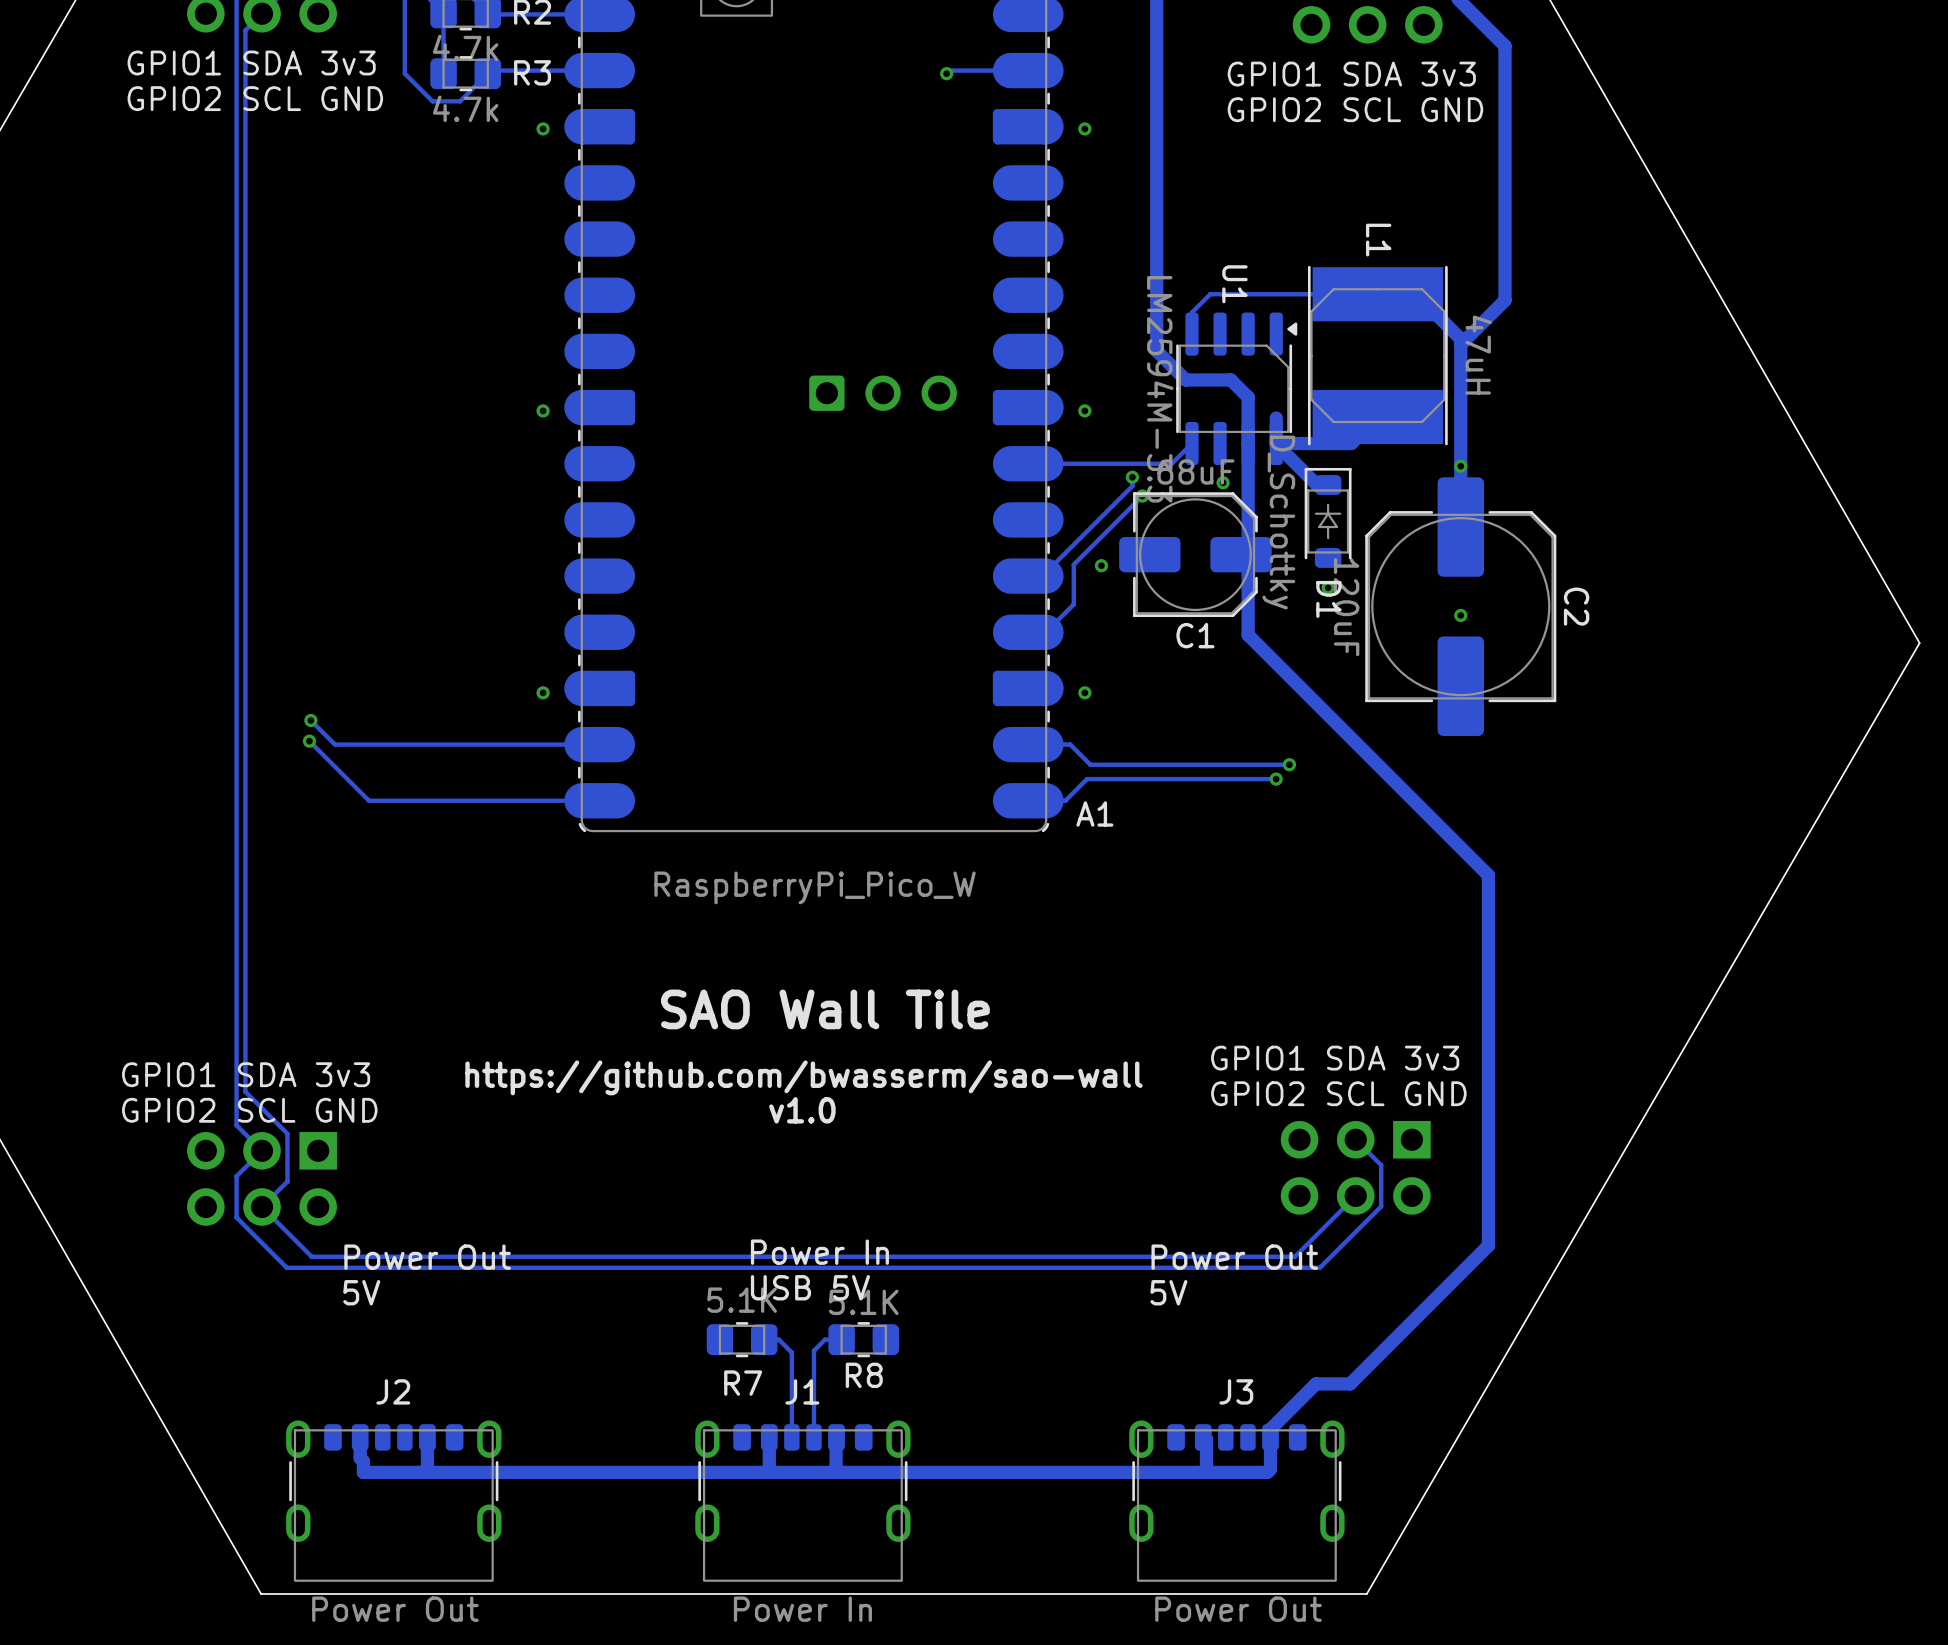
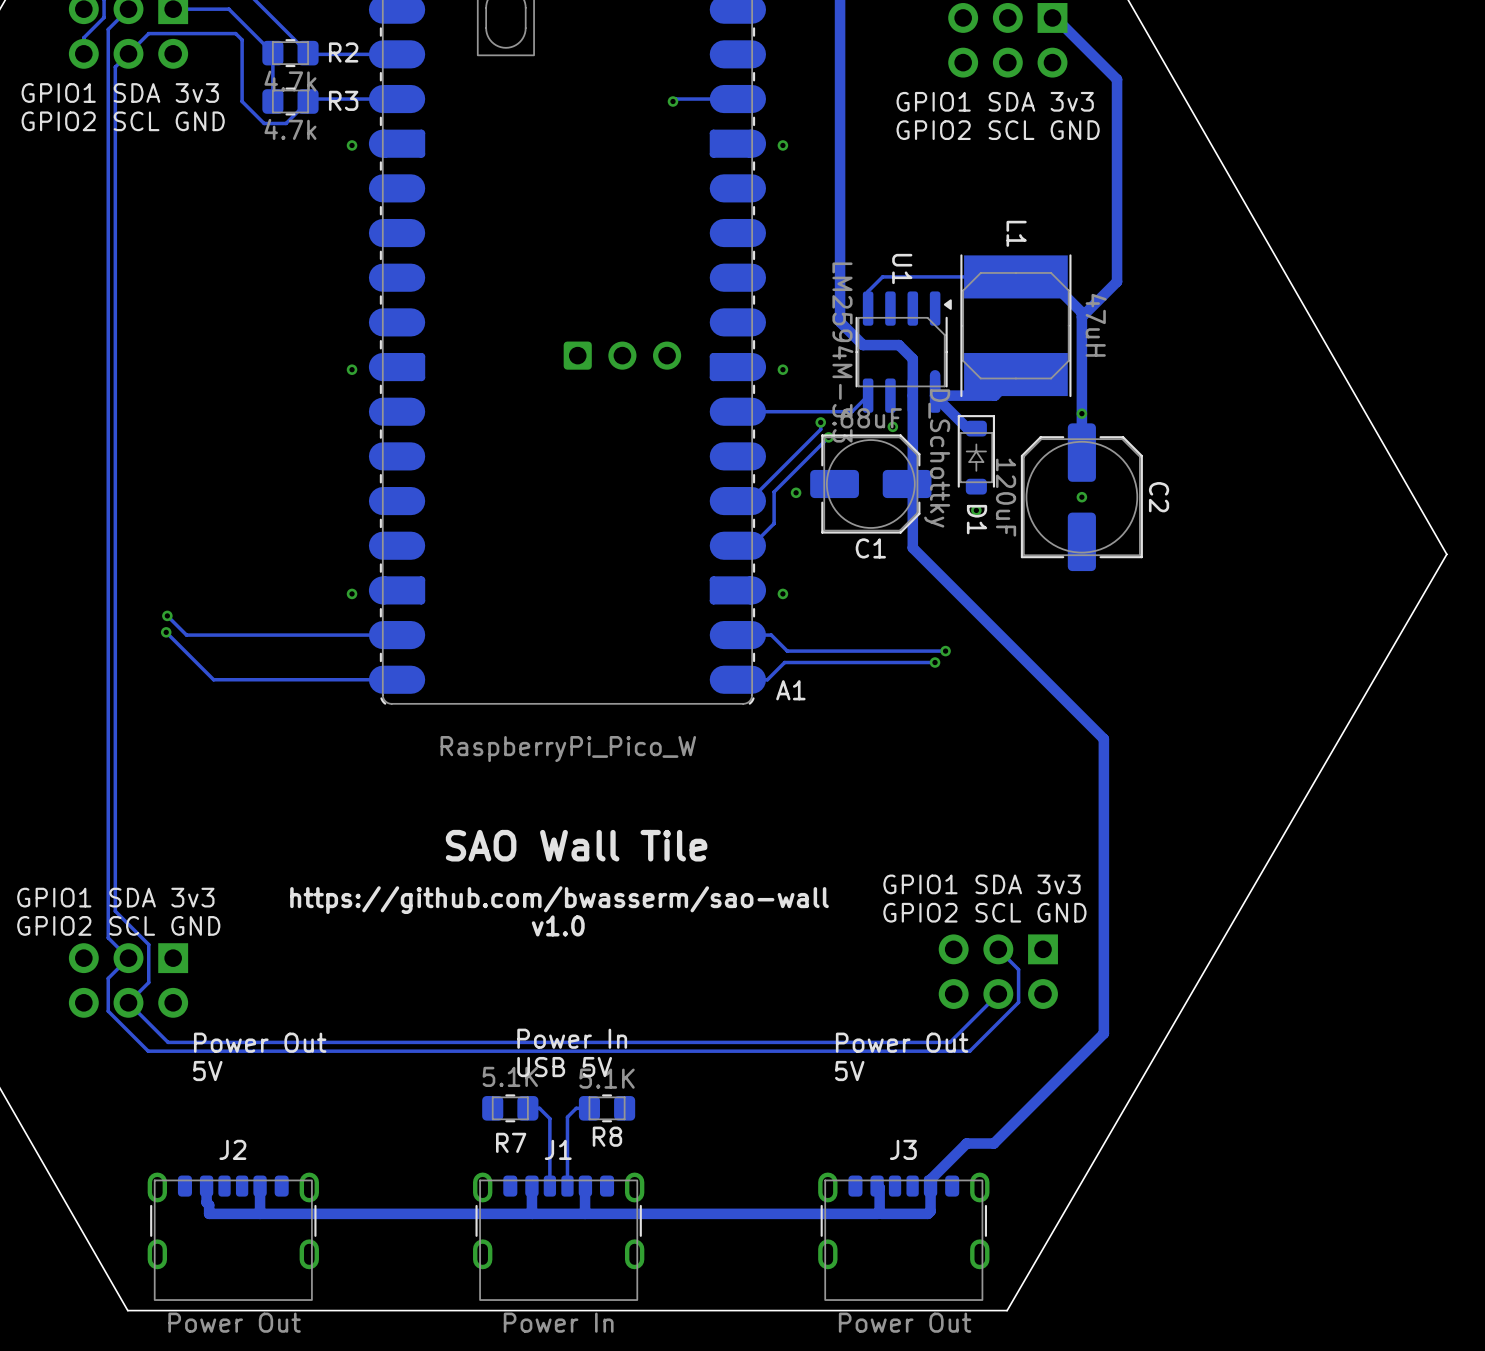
C2 footprint: [1365, 477, 1557, 736] -> [1020, 423, 1143, 572]
via position: (1460, 615) -> (1081, 497)

